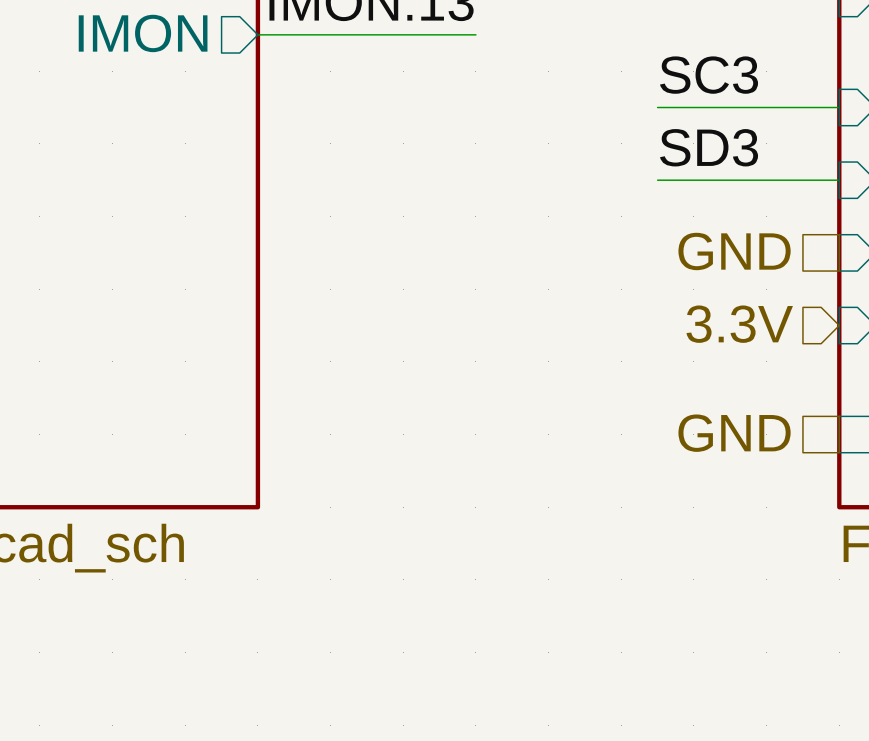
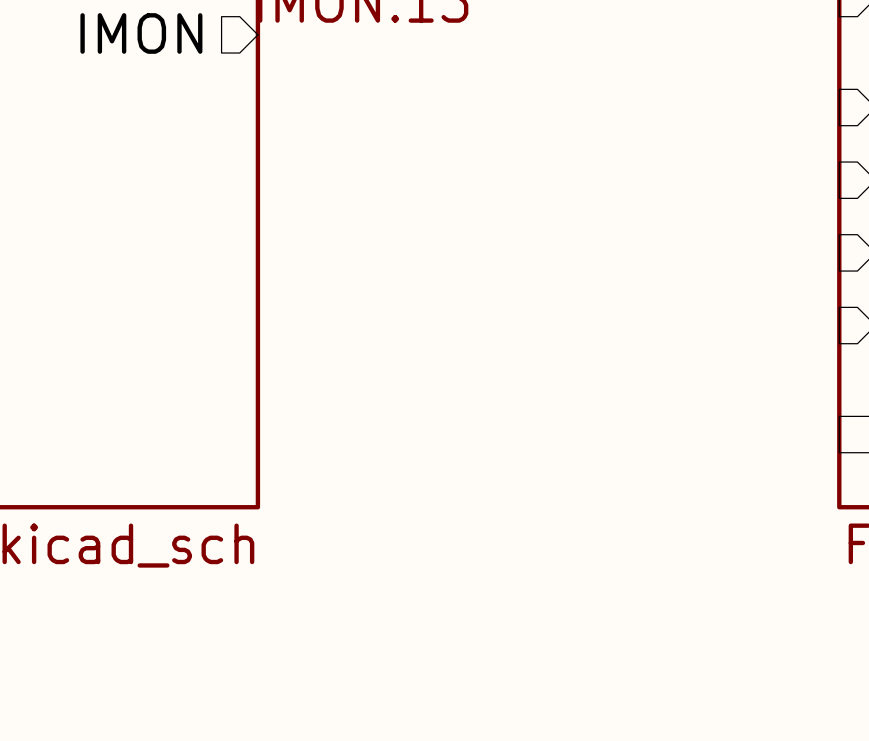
wire: (257, 34) (475, 34) -> none
label: SC3 (709, 75) -> none
wire: (657, 107) (839, 107) -> none
label: SD3 (709, 147) -> none
wire: (657, 180) (839, 180) -> none
hierarchical label: GND (734, 251) -> none
hierarchical label: 3.3V (739, 324) -> none
hierarchical label: GND (734, 433) -> none

